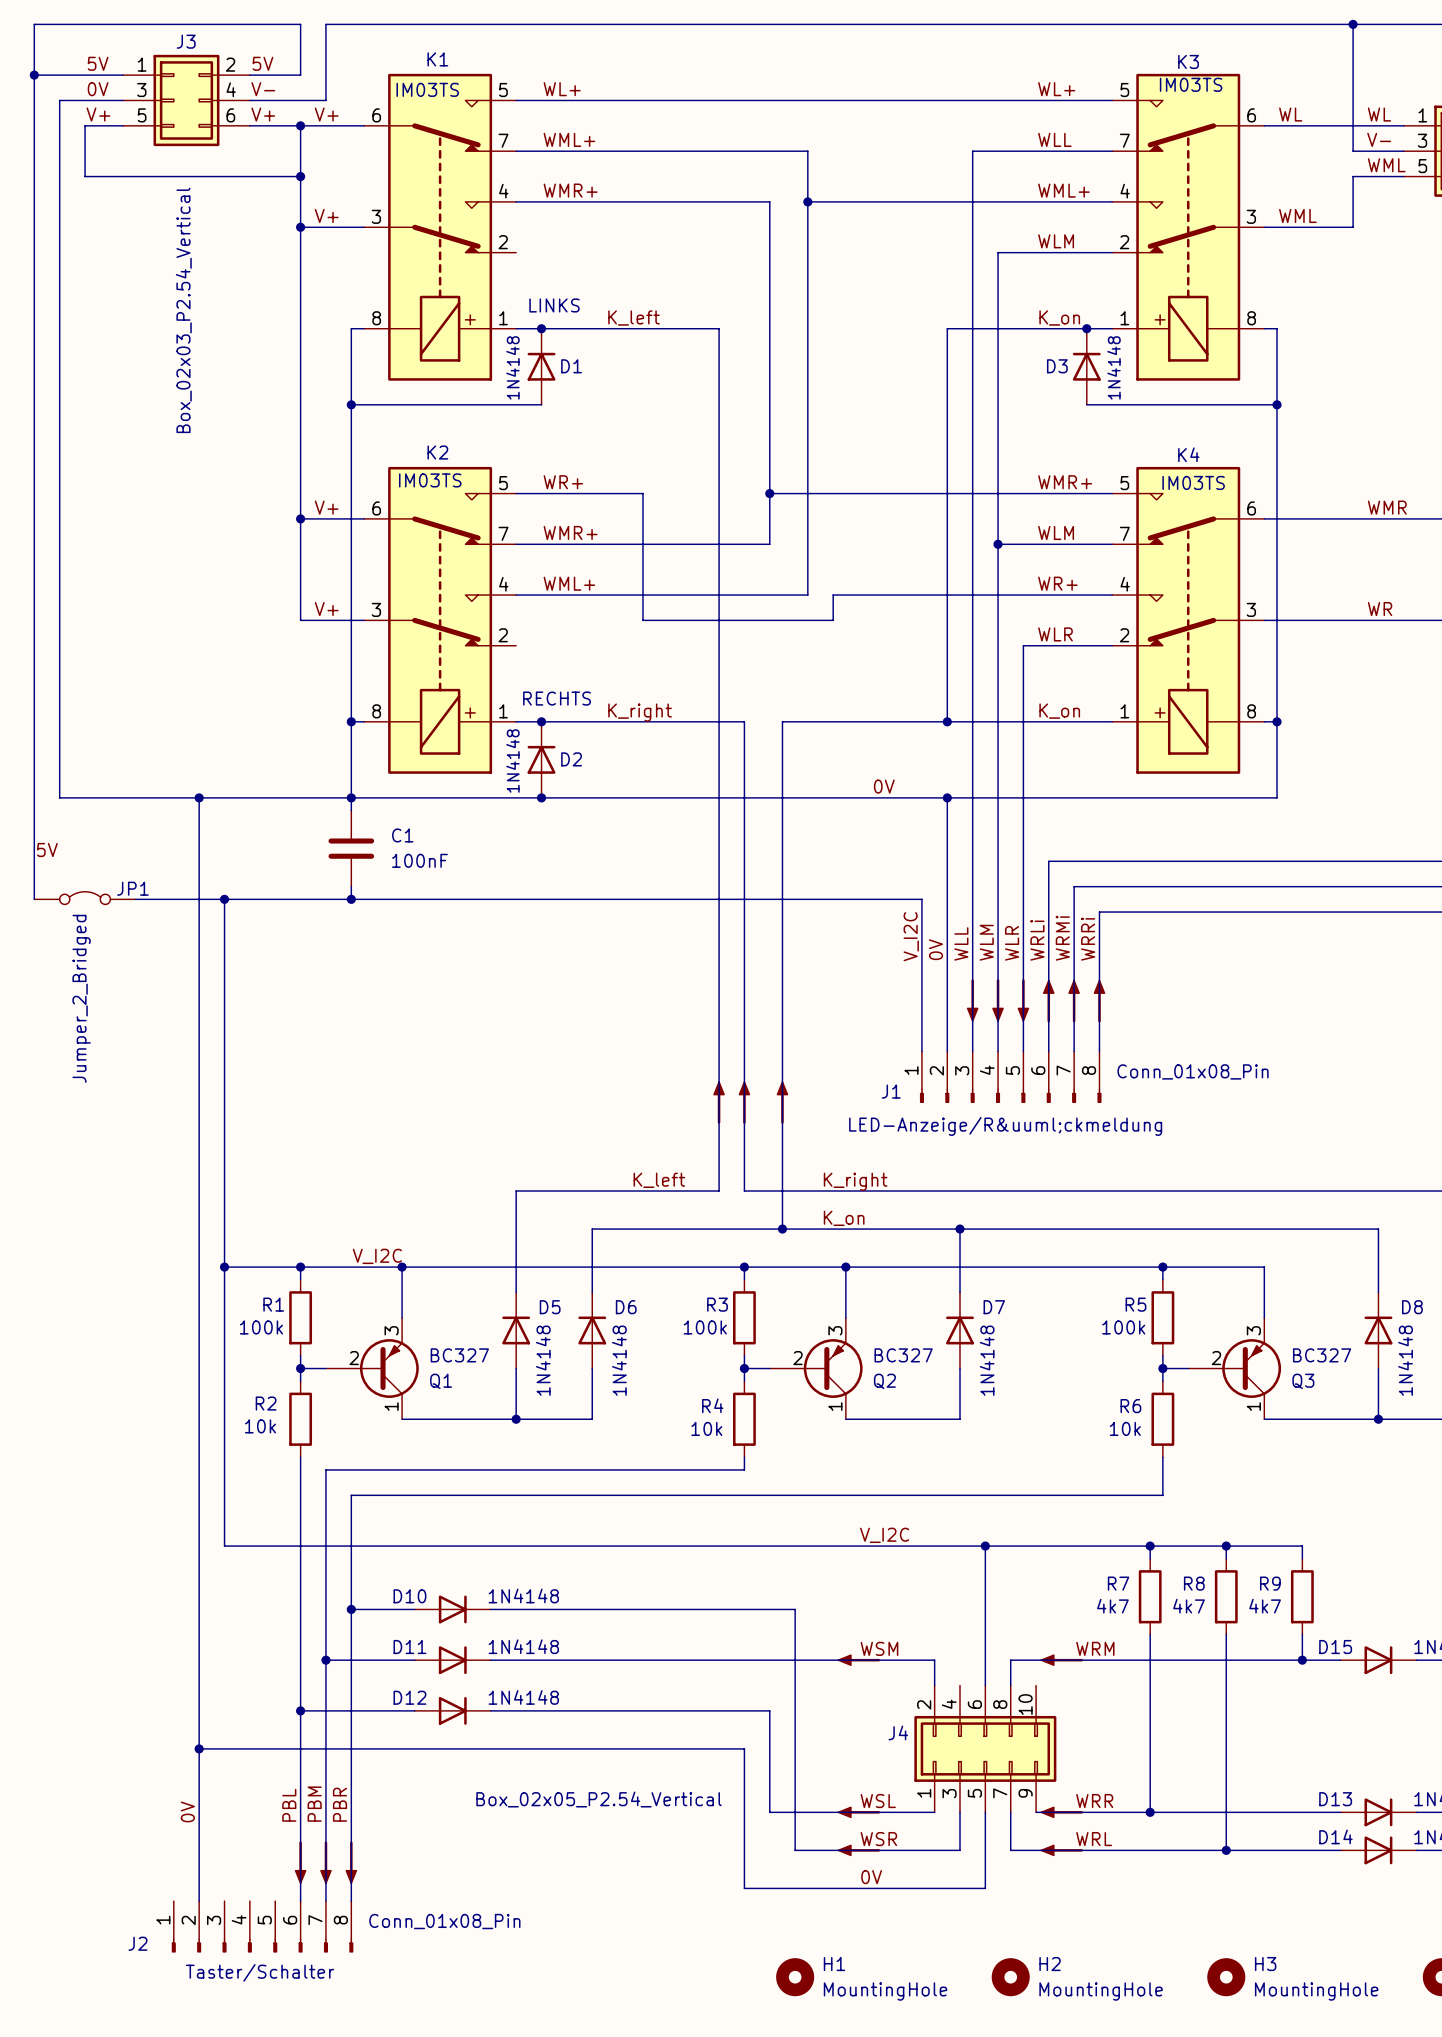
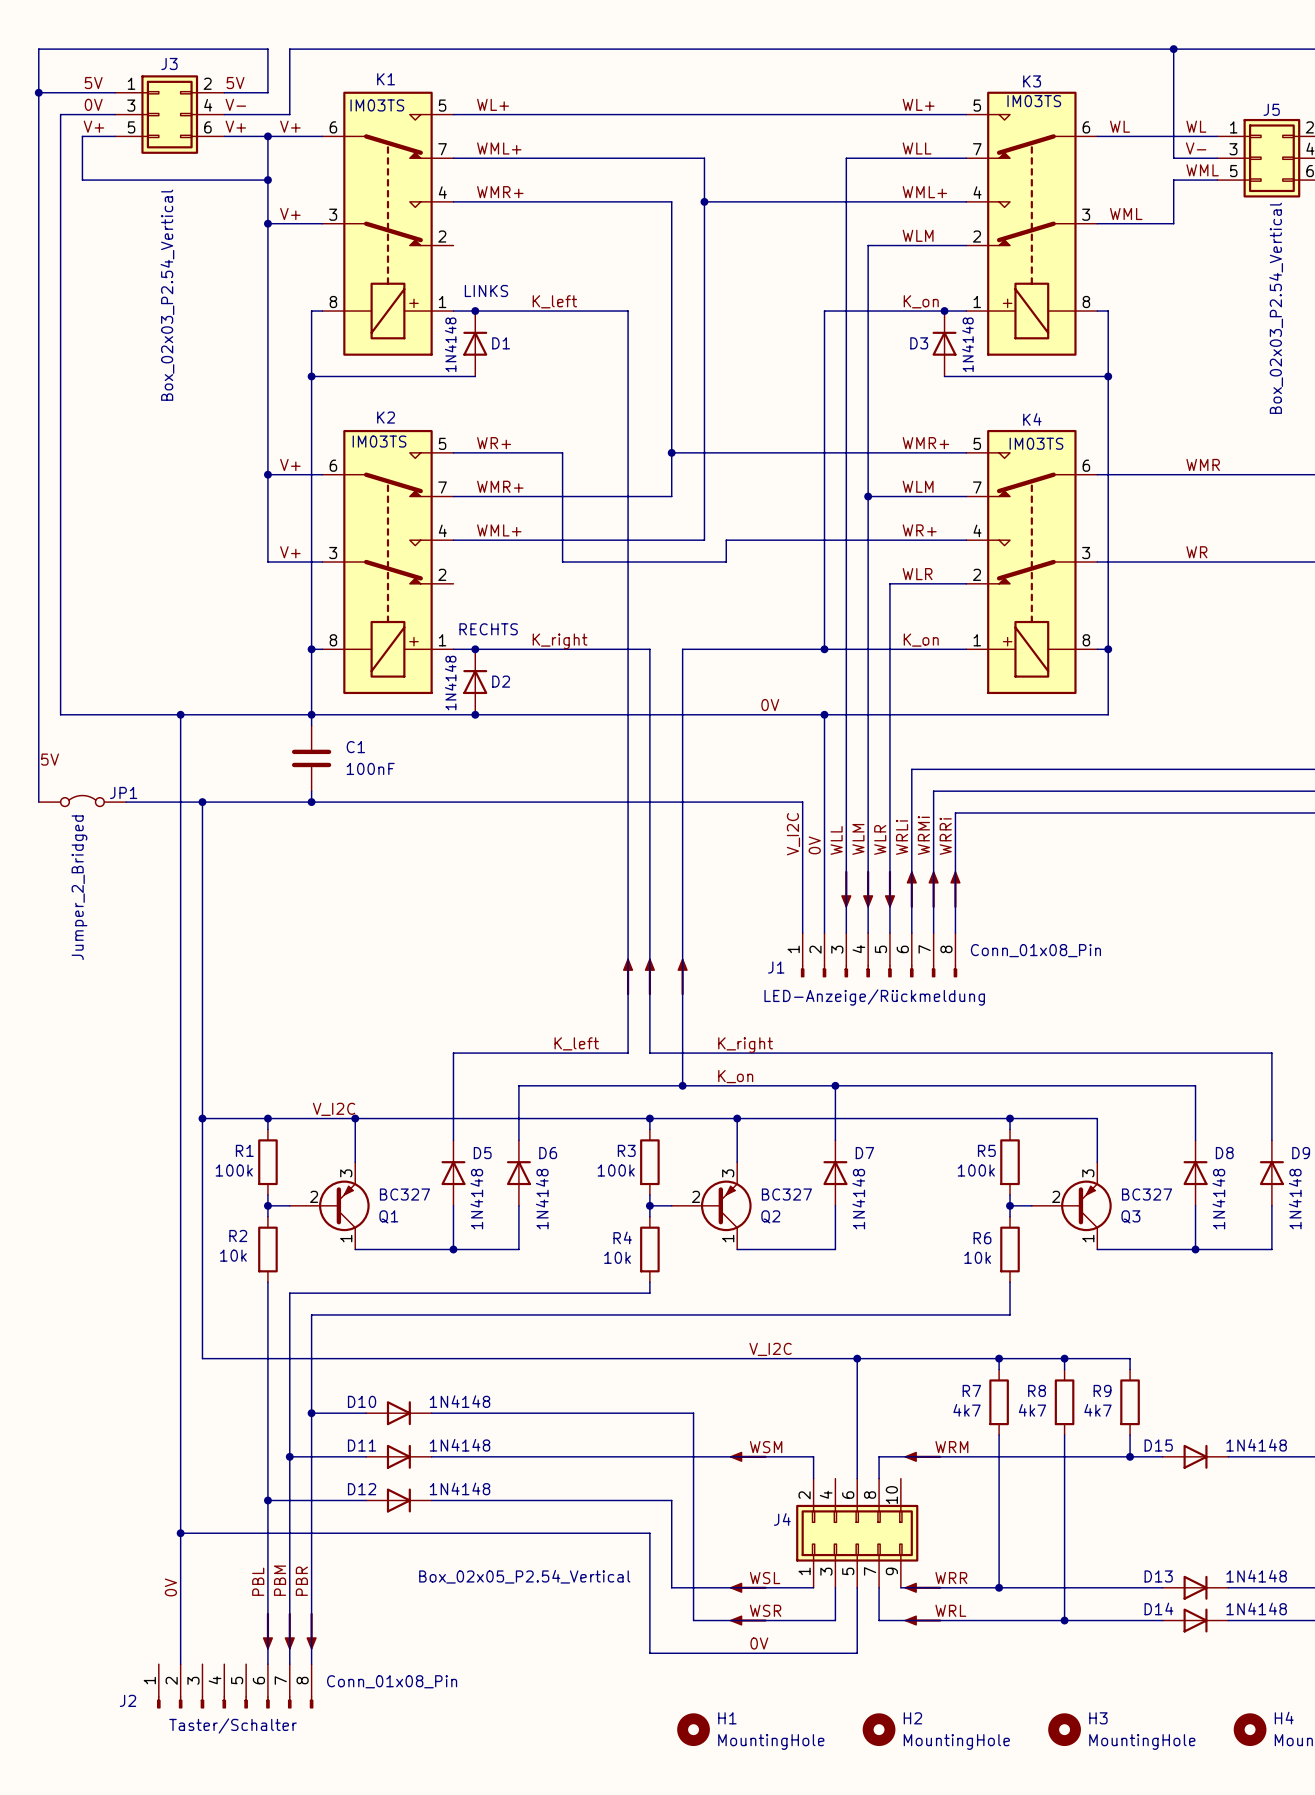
text: LED-Anzeige/R&uuml;ckmeldung (1005, 1126) -> LED-Anzeige/Rückmeldung (874, 997)

